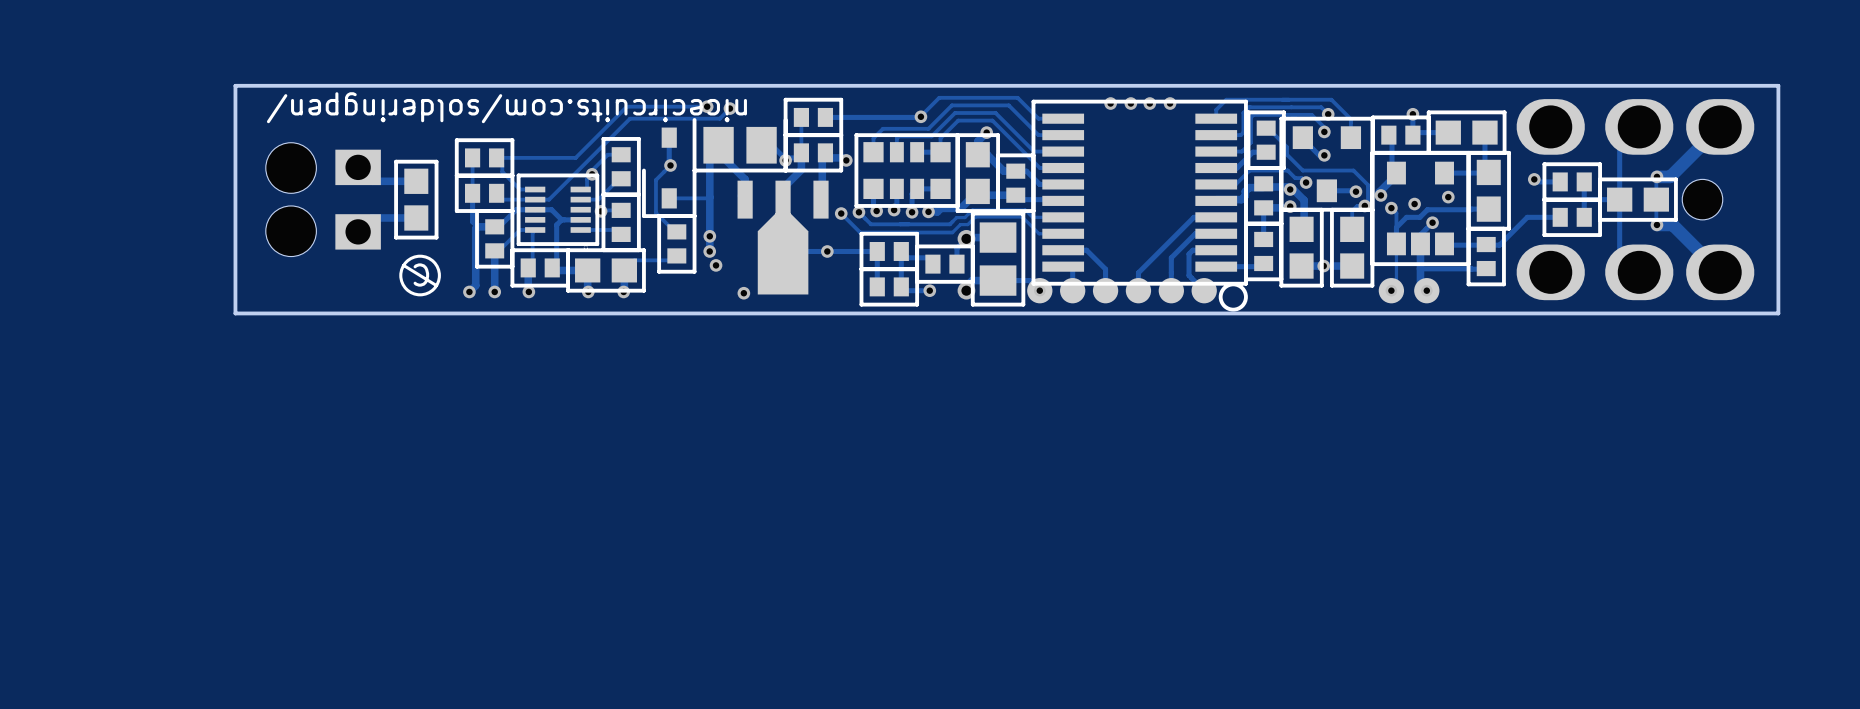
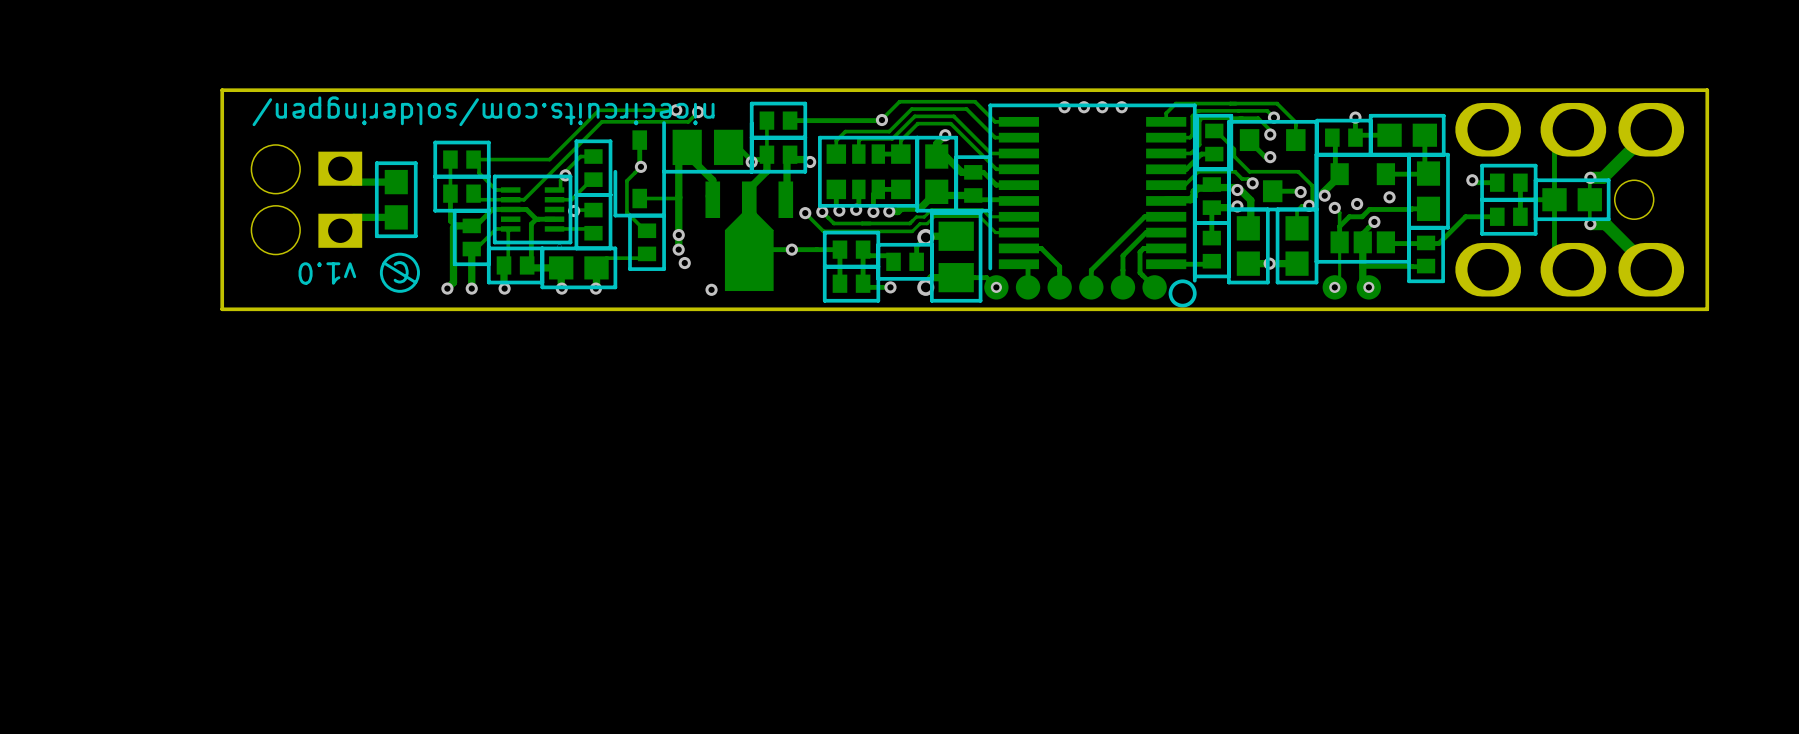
part footprint: [1031, 99, 1248, 312] -> [988, 103, 1197, 308]
text: none -> v1.0 (327, 273)

